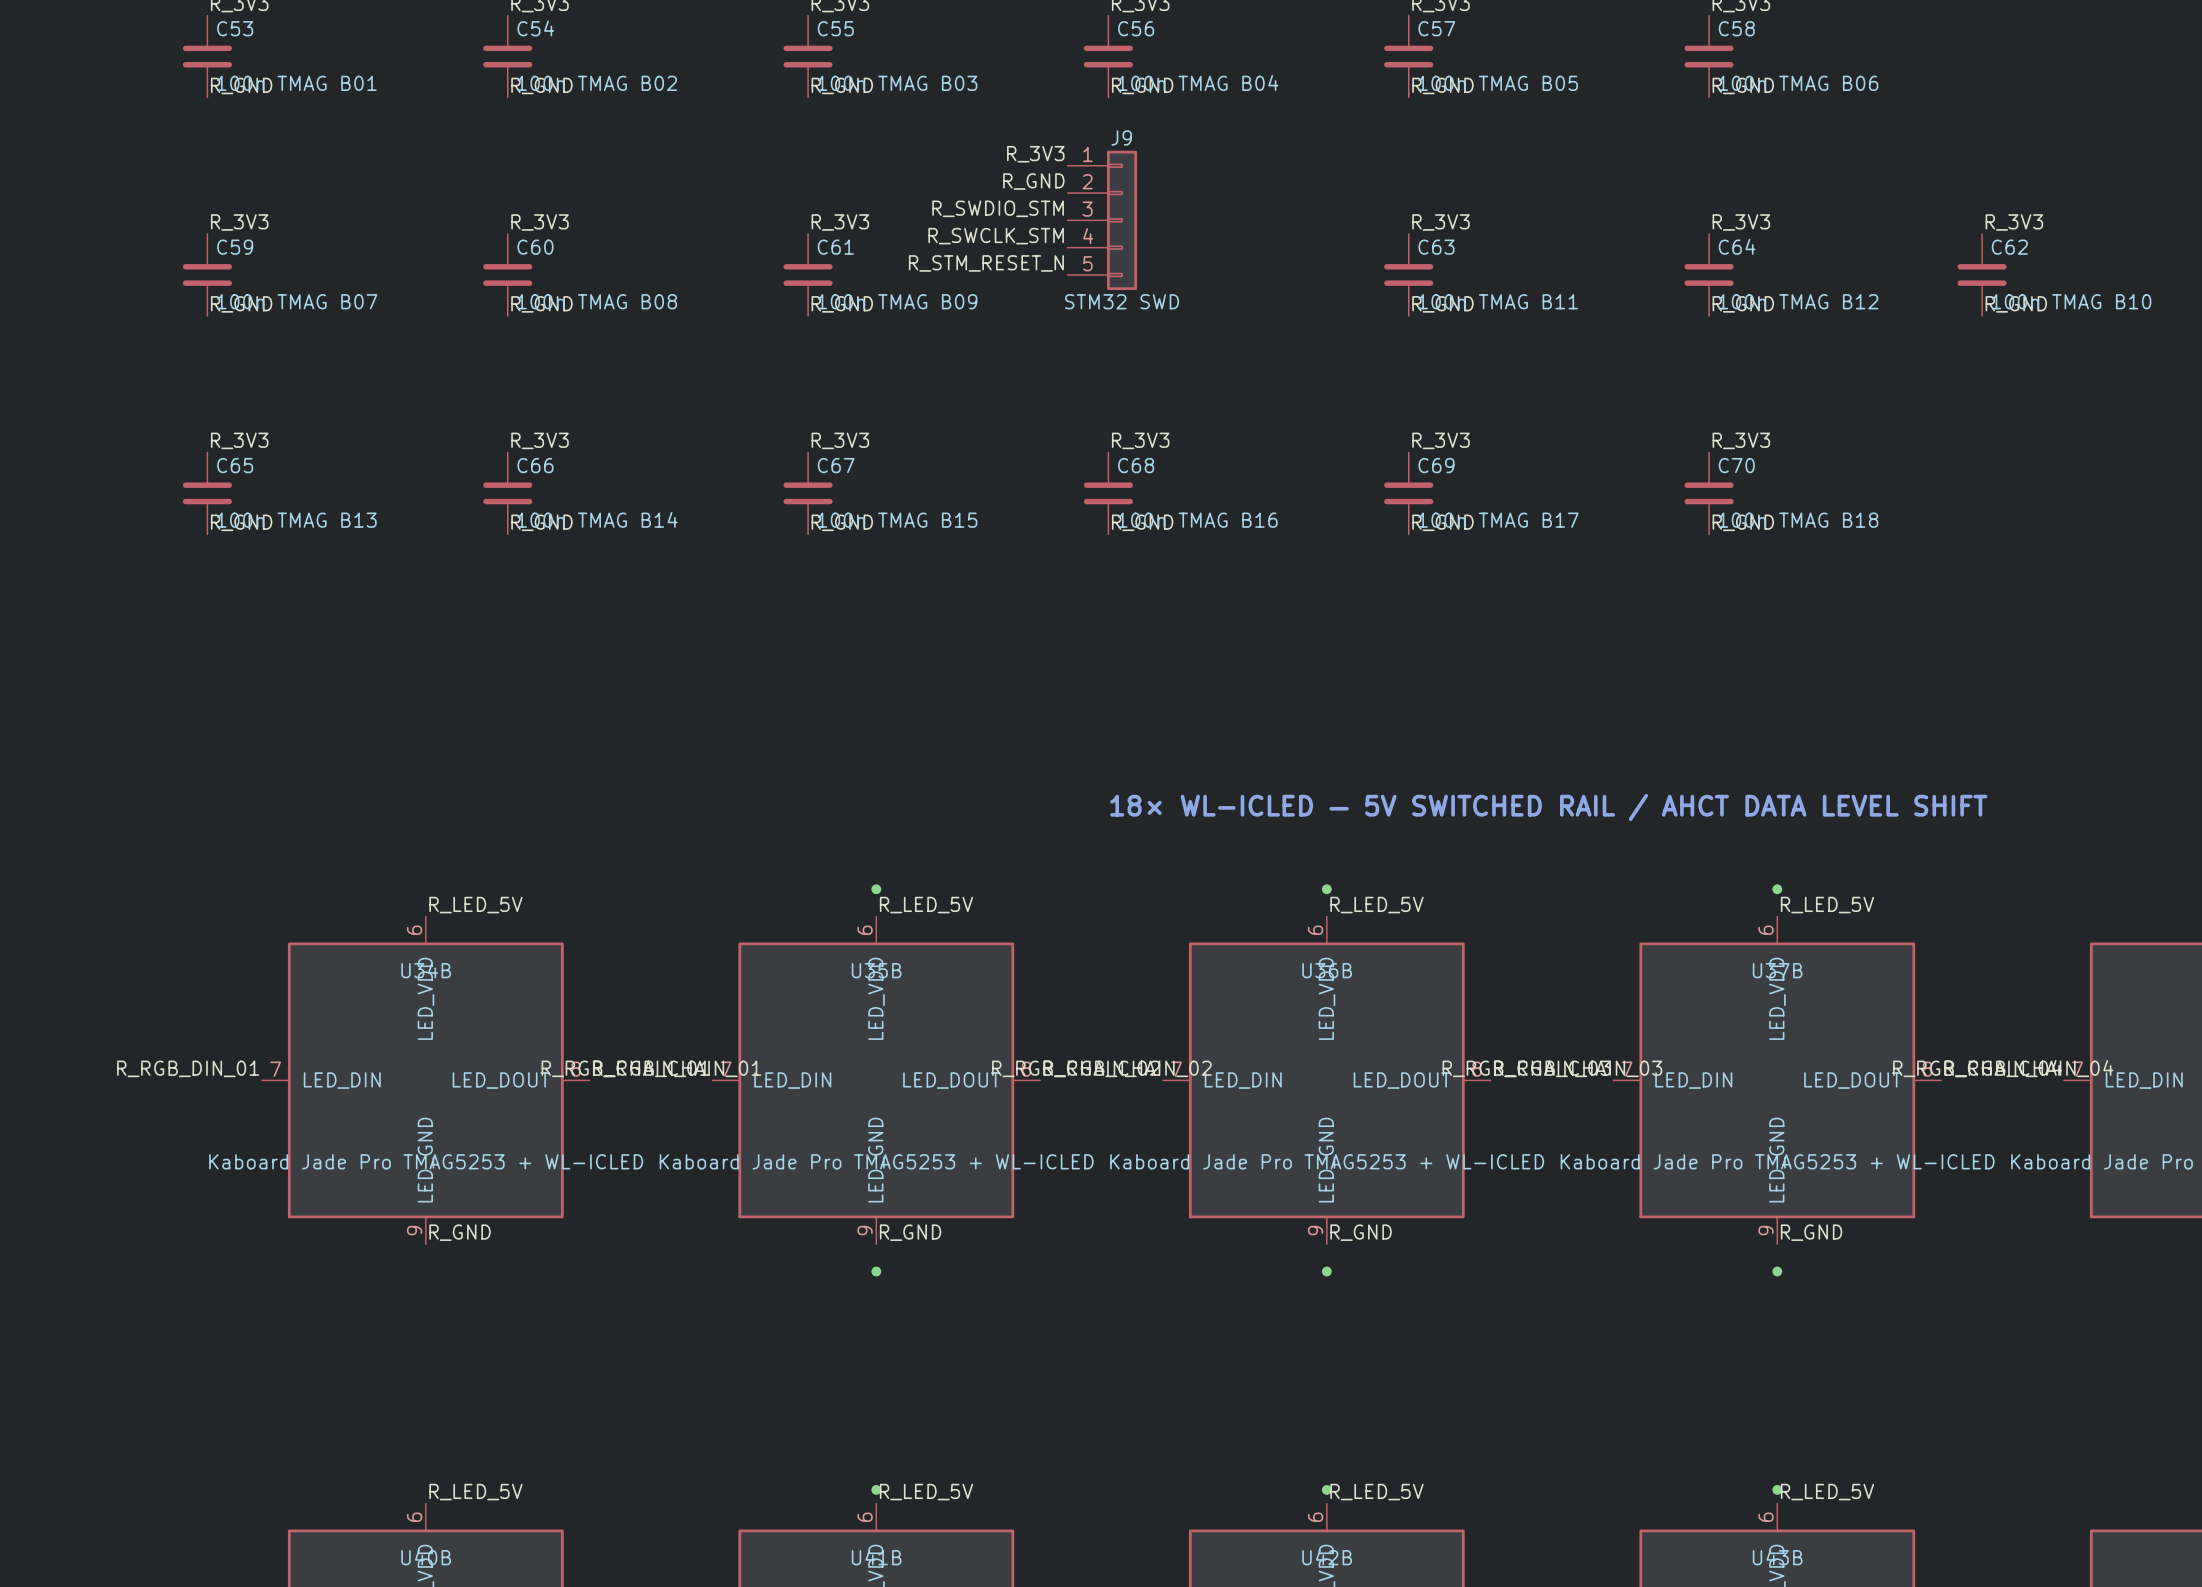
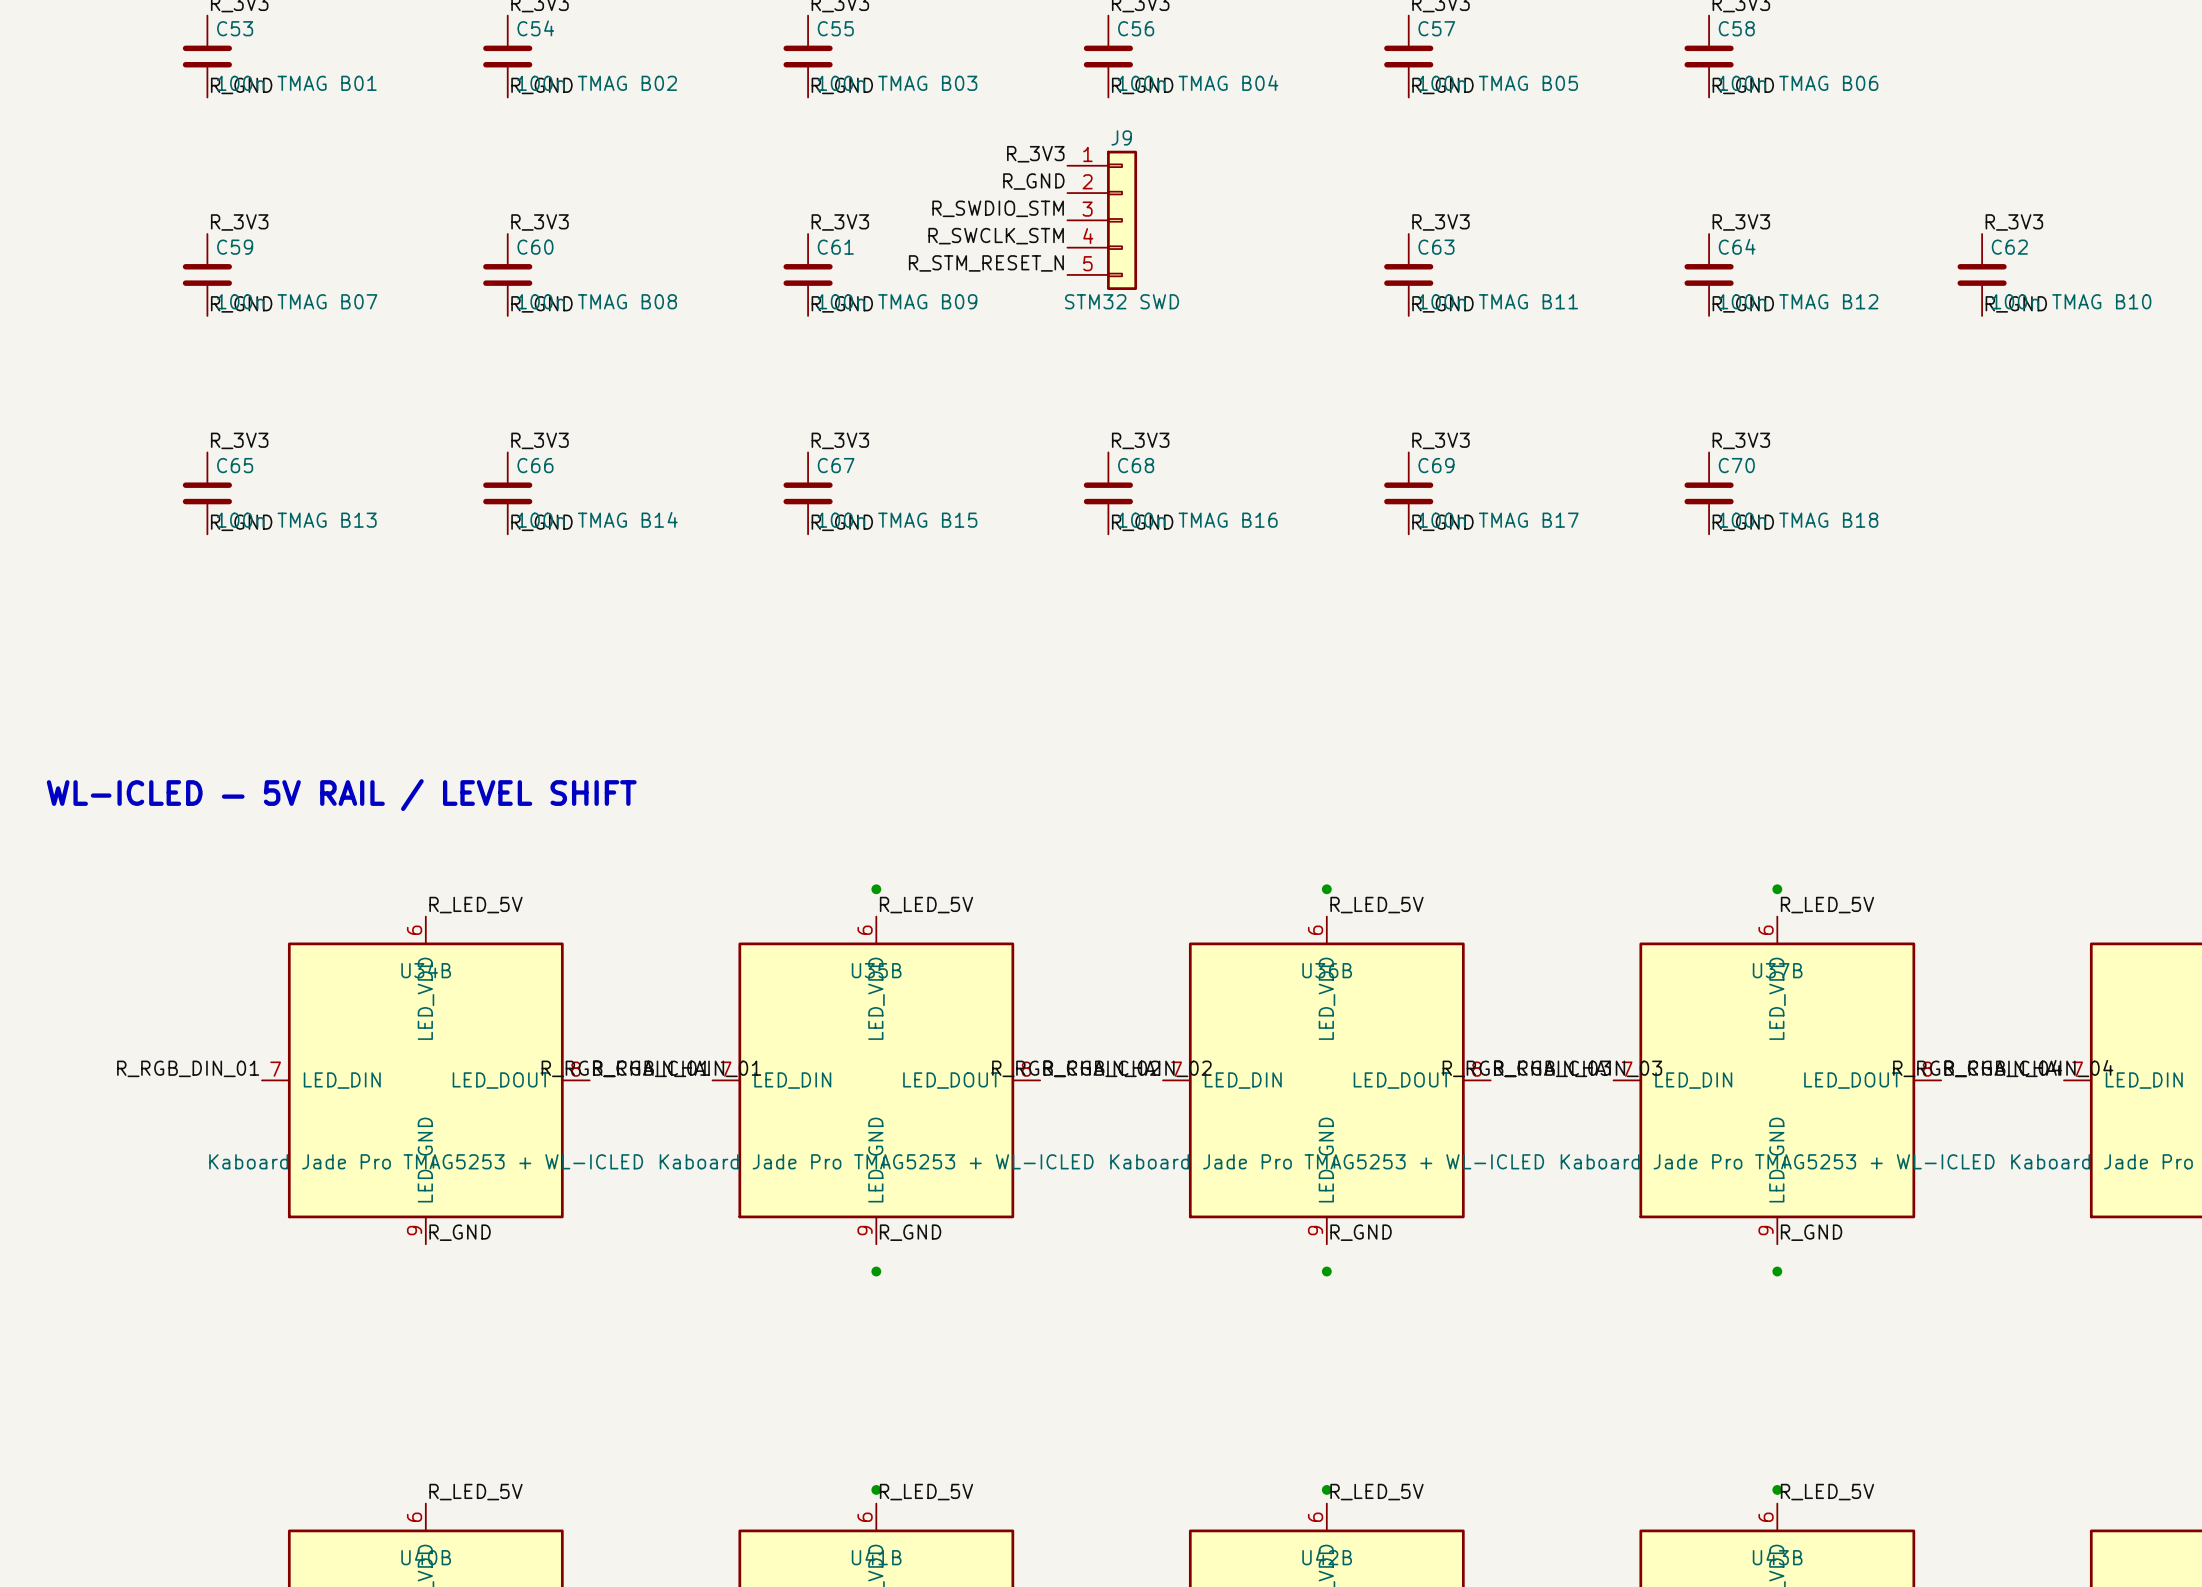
text: none -> WL-ICLED — 5V RAIL / LEVEL SHIFT (341, 795)
text: 18× WL-ICLED — 5V SWITCHED RAIL / AHCT DATA LEVEL SHIFT (1548, 807) -> none

